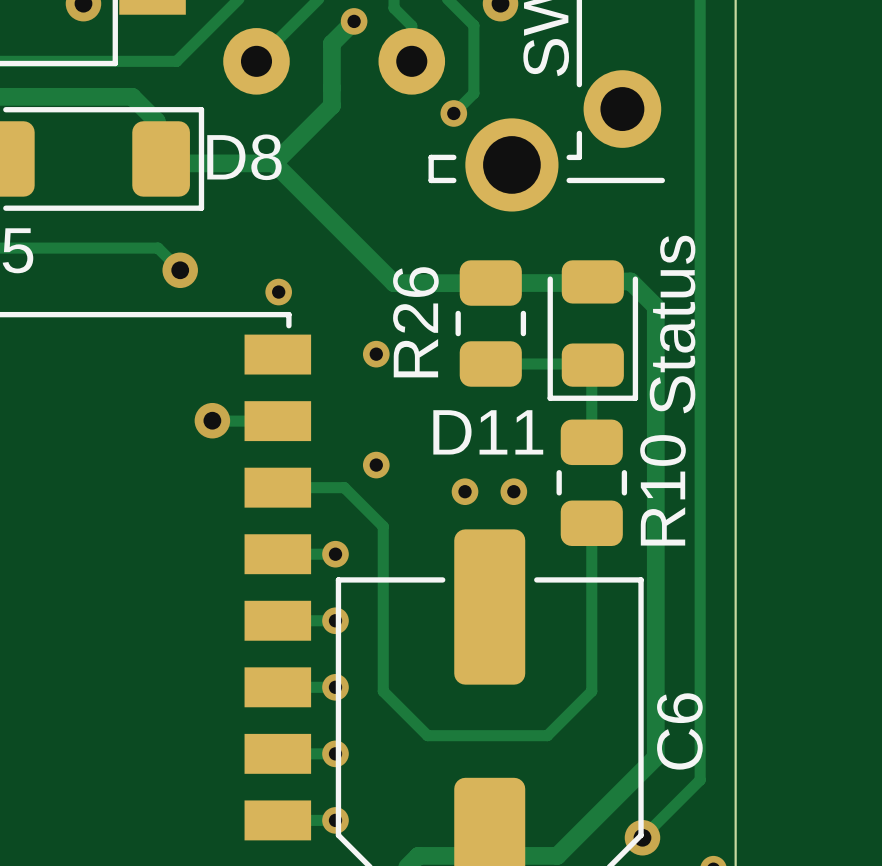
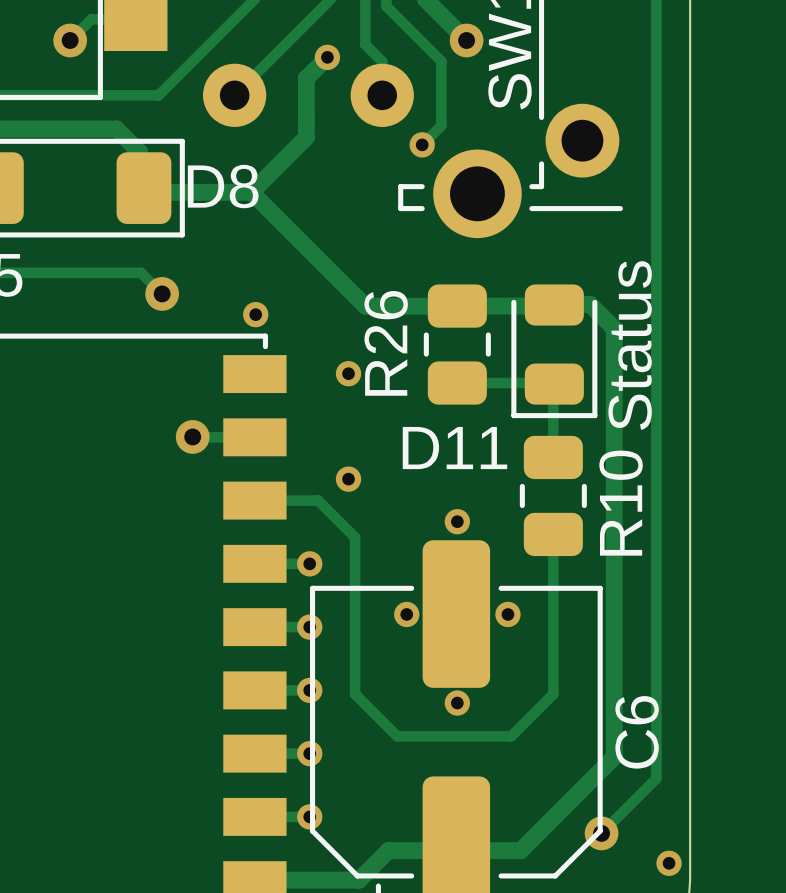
via: (465, 491) -> none
via: (513, 491) -> none
via: none -> (457, 521)
via: none -> (406, 614)
via: none -> (507, 614)
via: none -> (457, 703)

